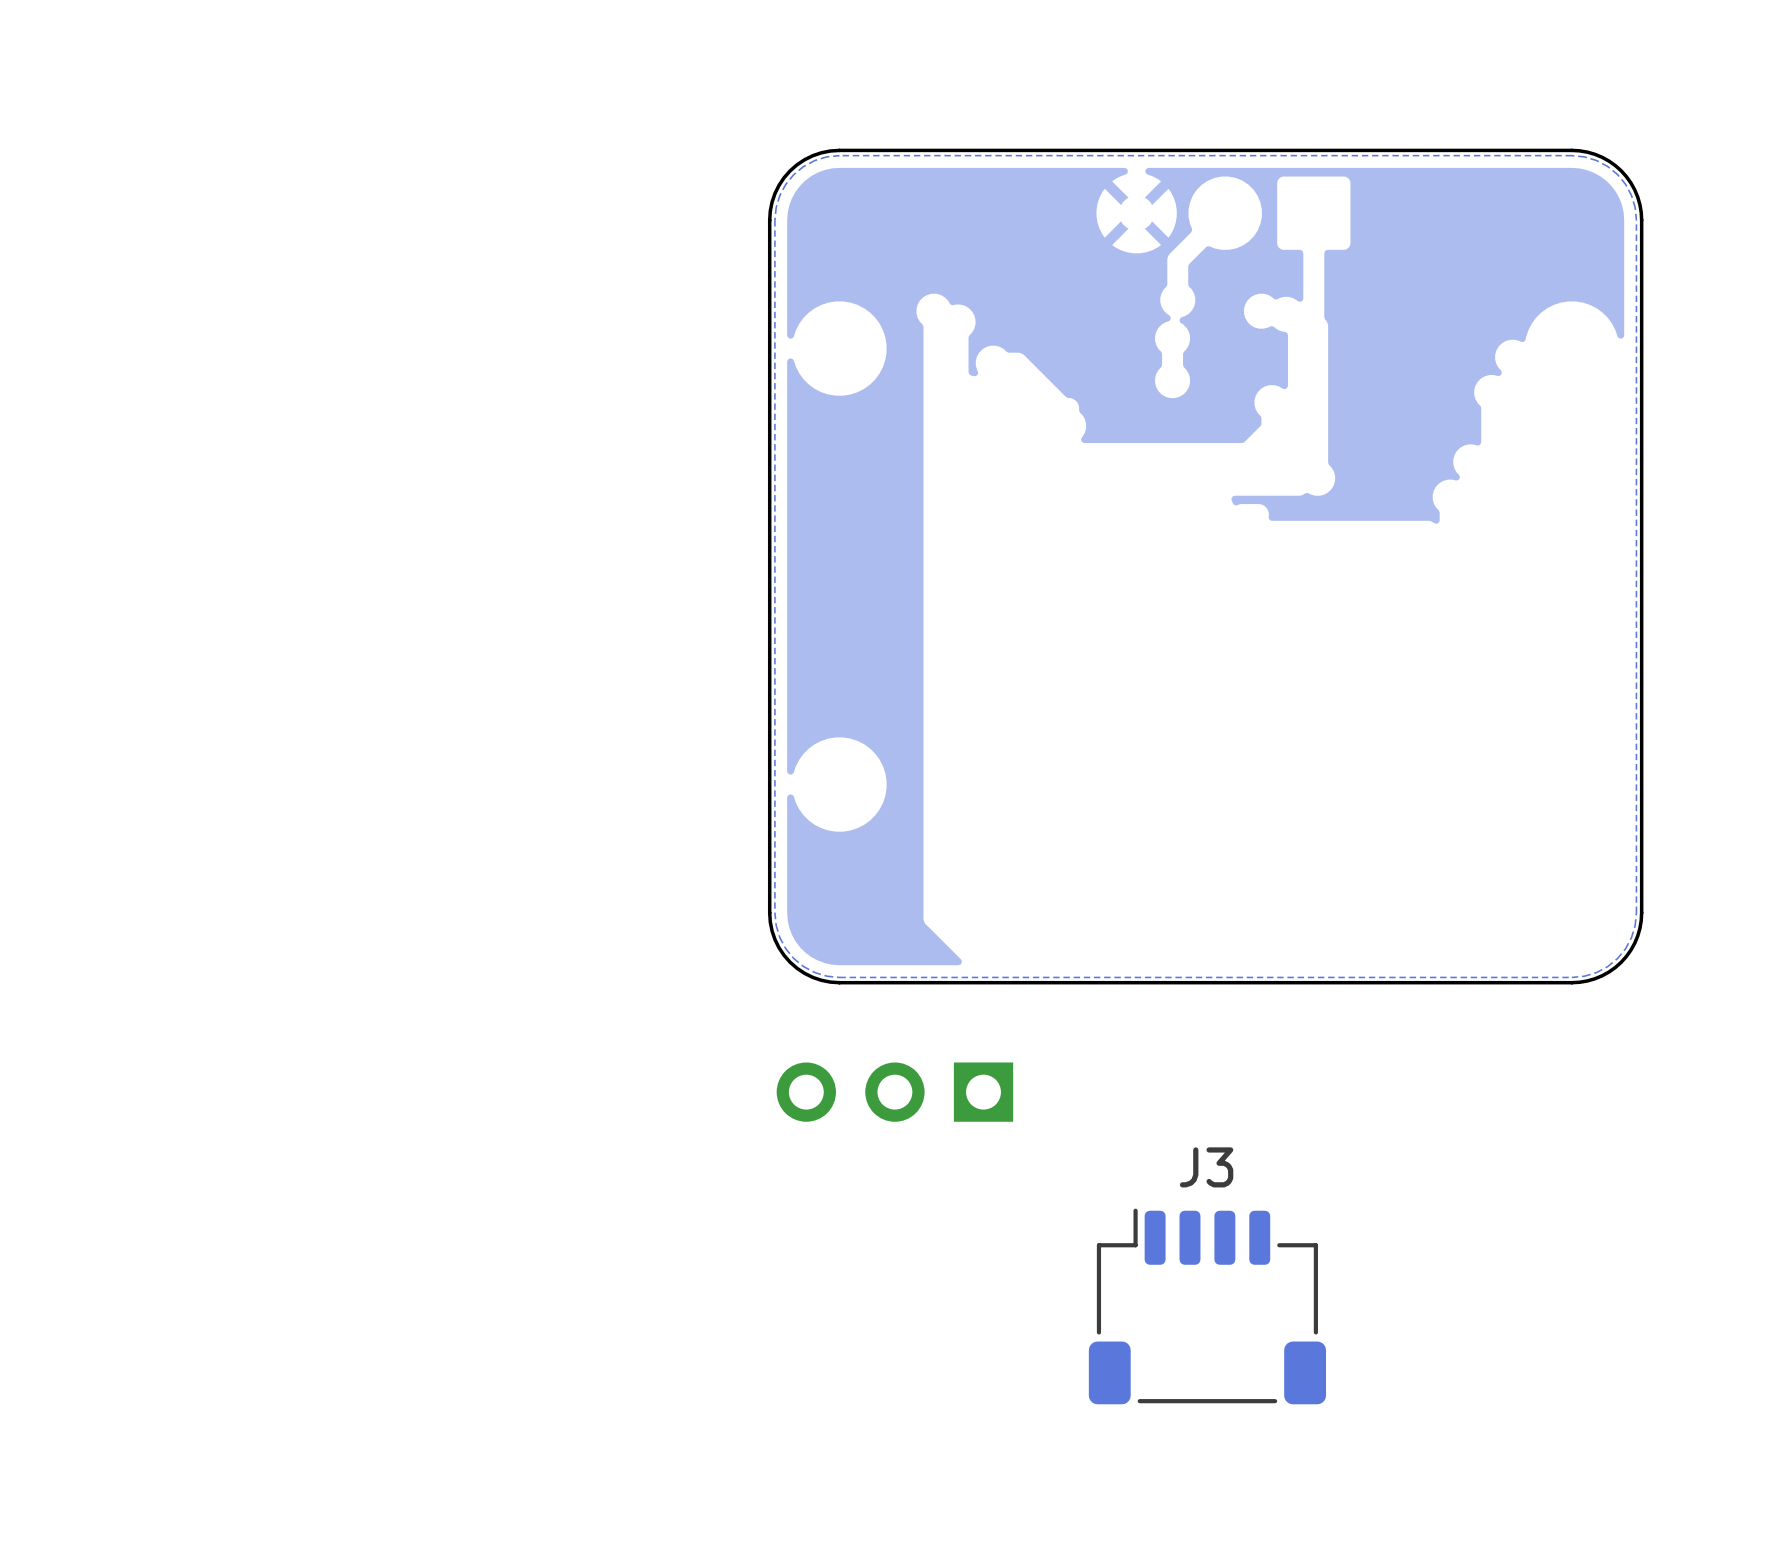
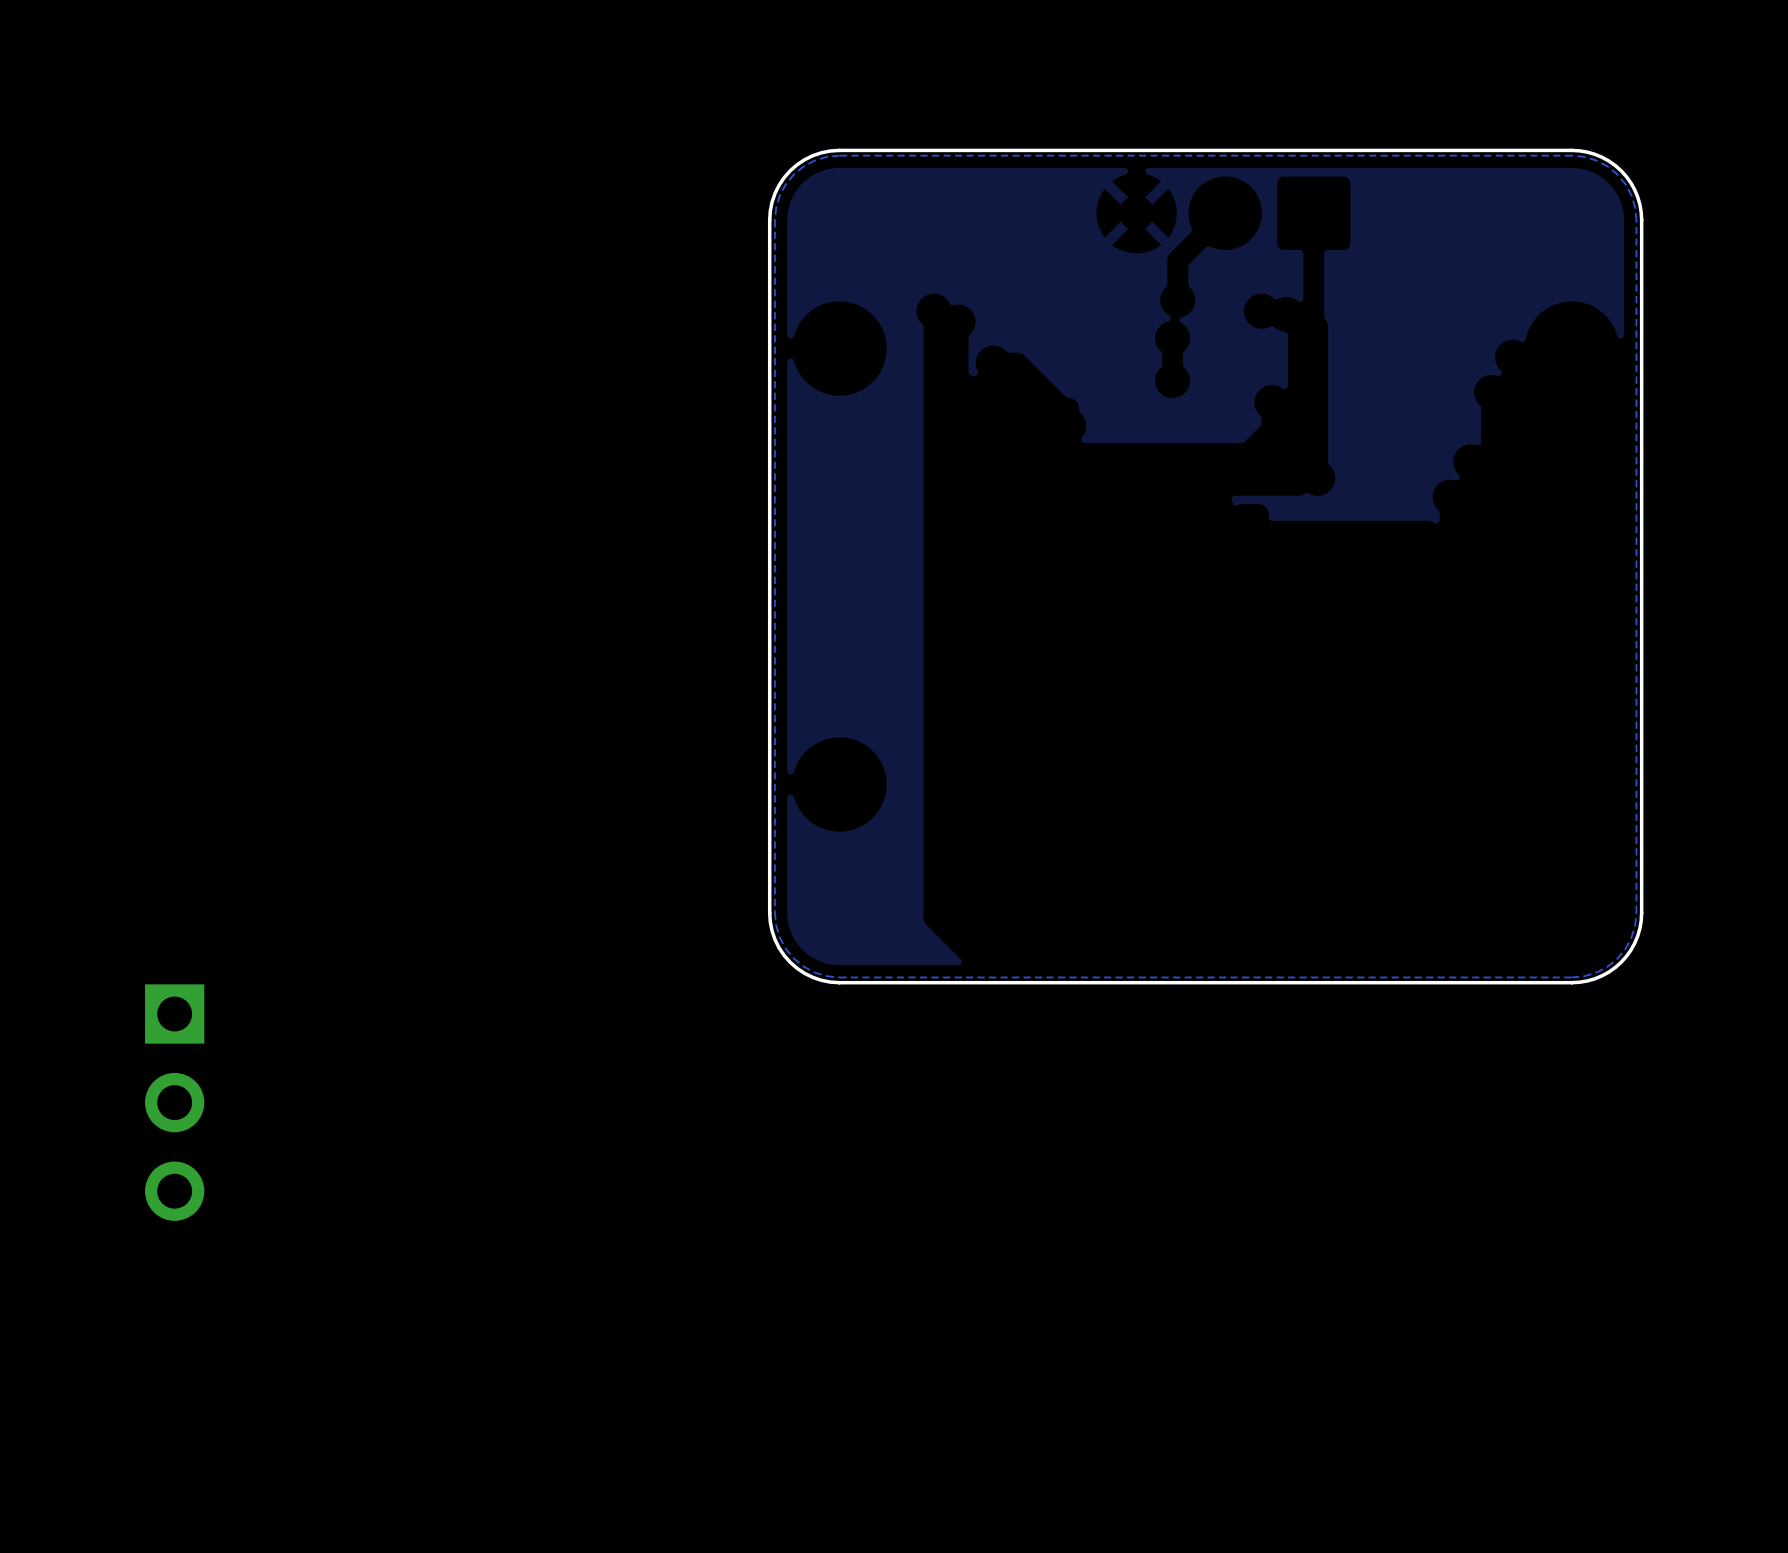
part rotation: 0° (894, 1092) -> 90° counterclockwise (174, 1102)
part position: (894, 1092) -> (174, 1102)
J3: (1207, 1306) -> none

